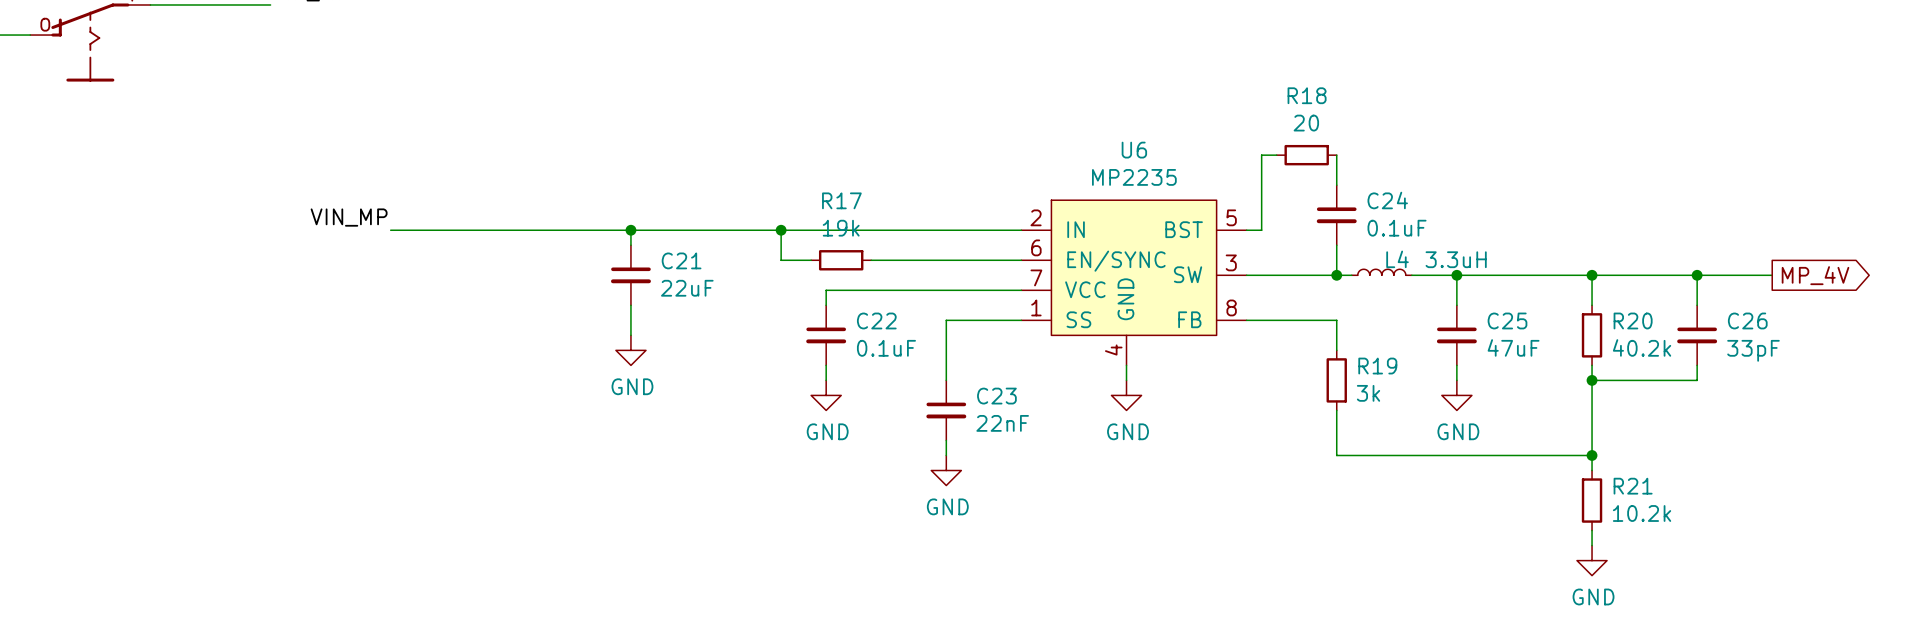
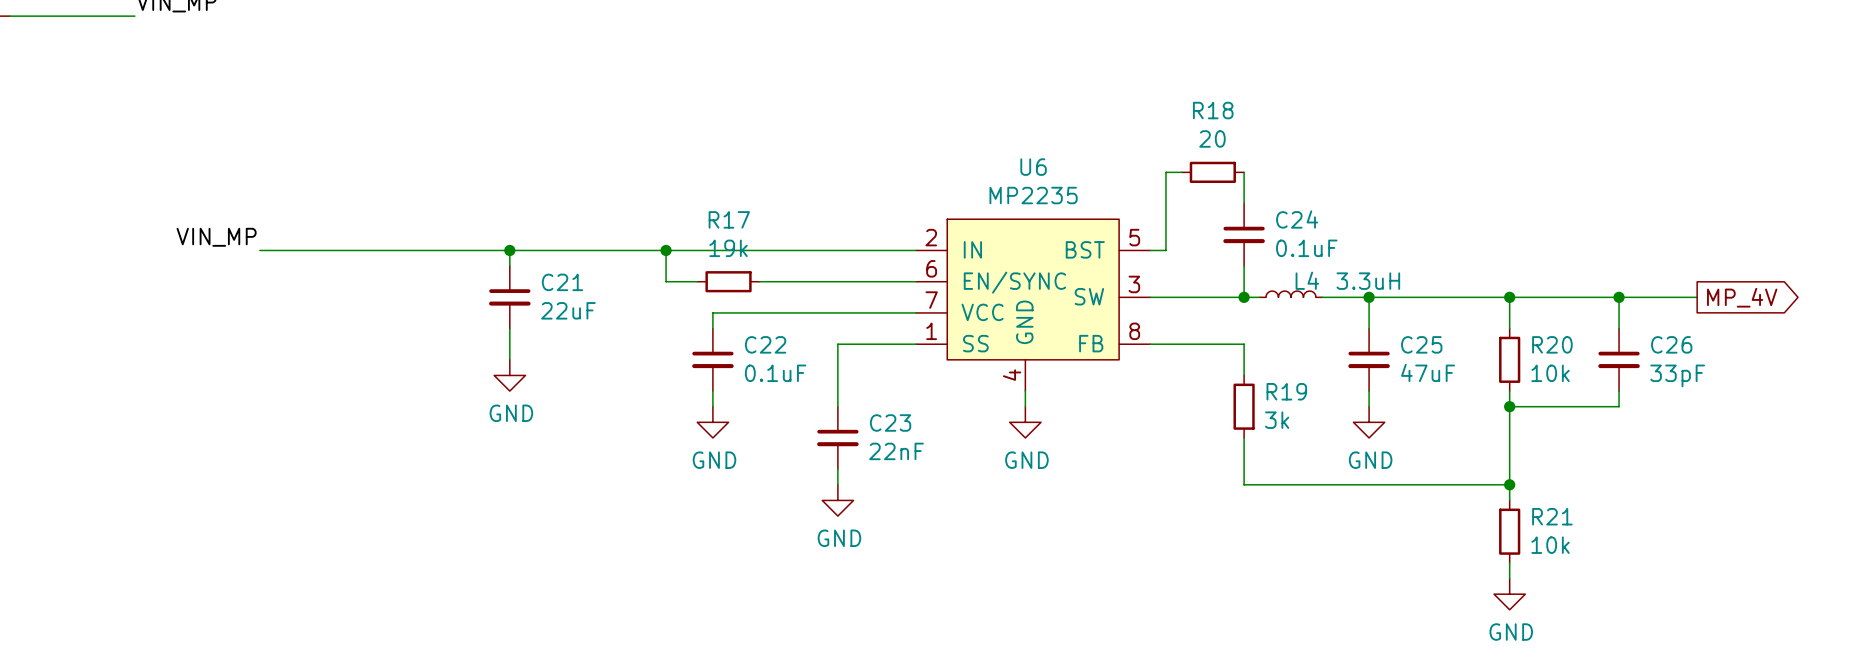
R20 value: 40.2k (1642, 347) -> 10k (1550, 373)
R21 value: 10.2k (1642, 513) -> 10k (1550, 545)

